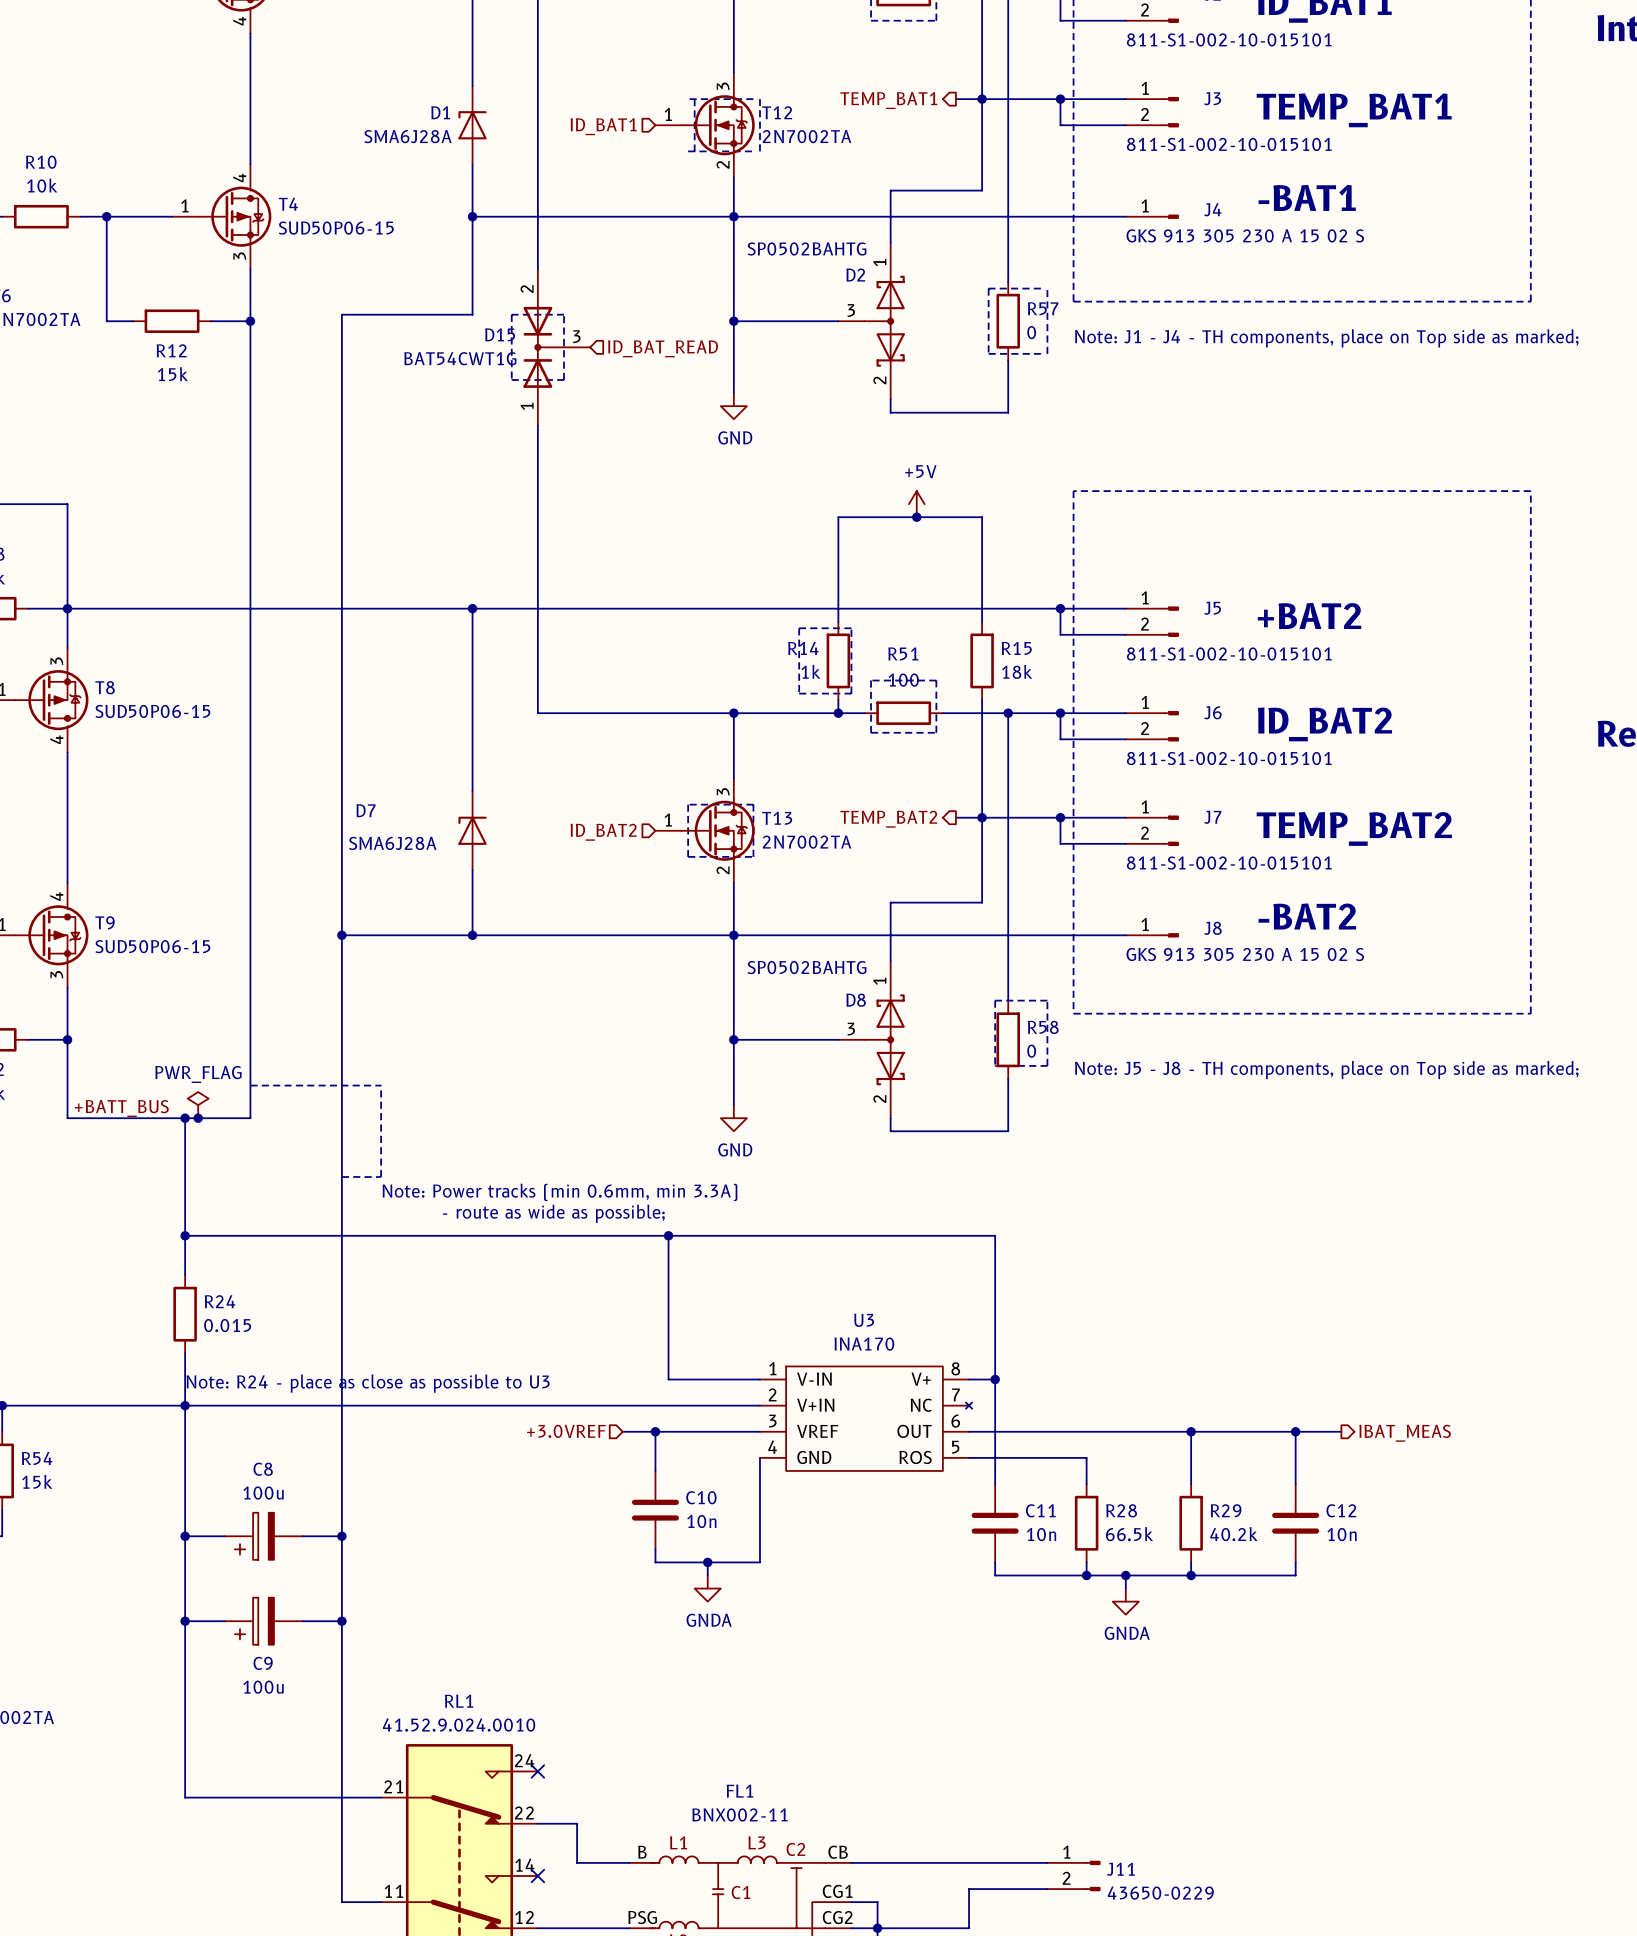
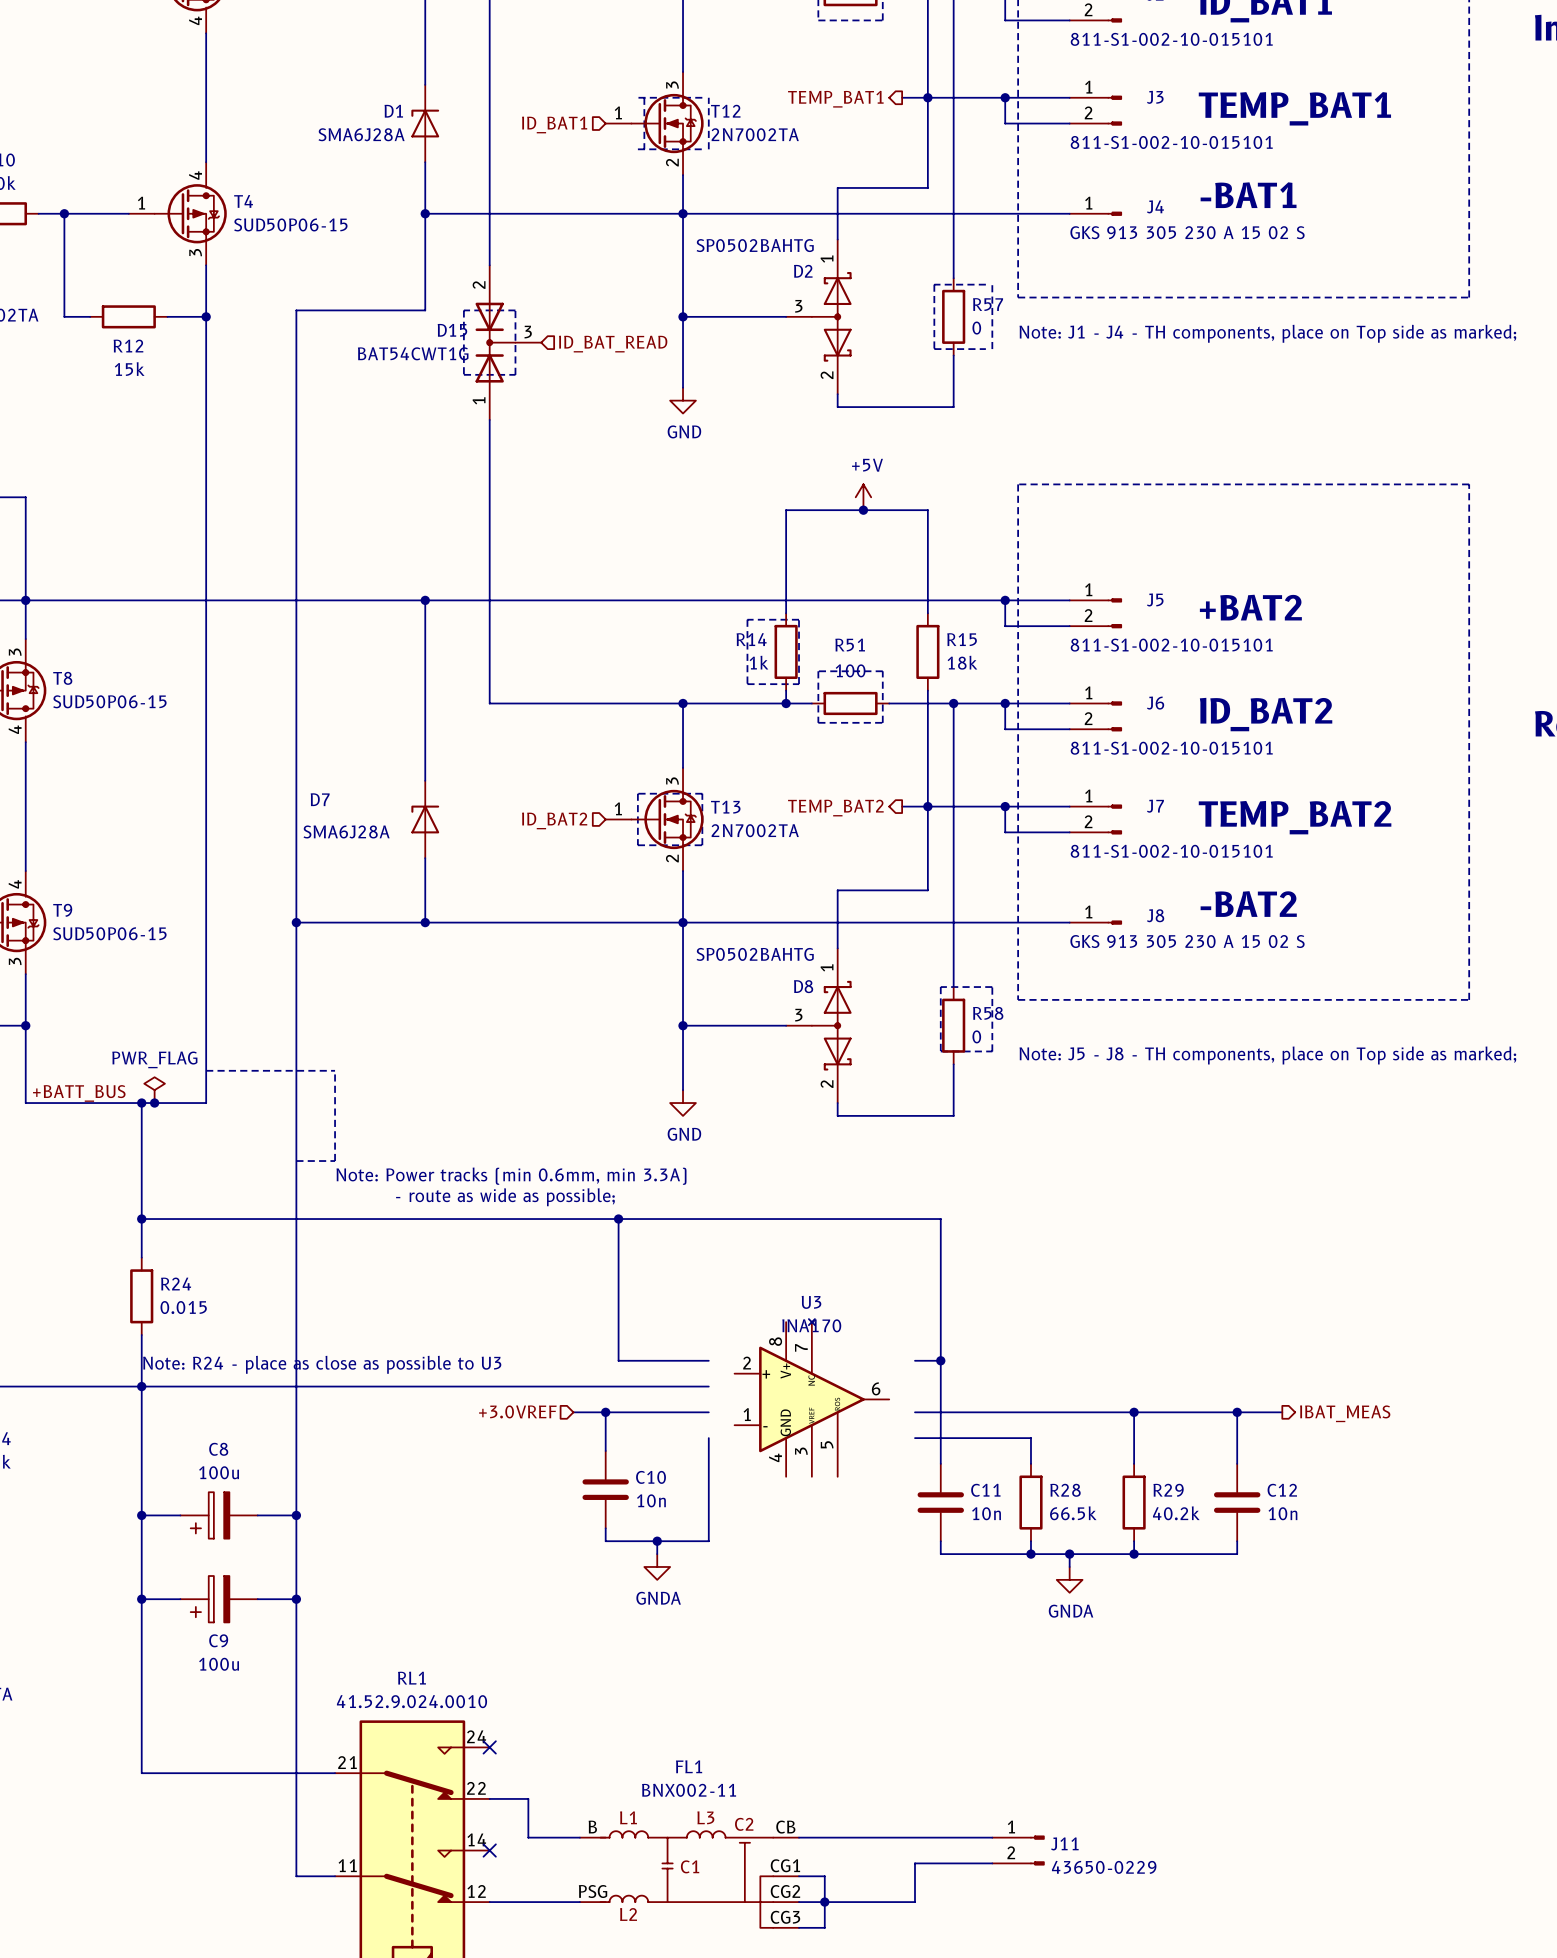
U3 symbol: [759, 1366, 973, 1471] -> [734, 1319, 890, 1477]

